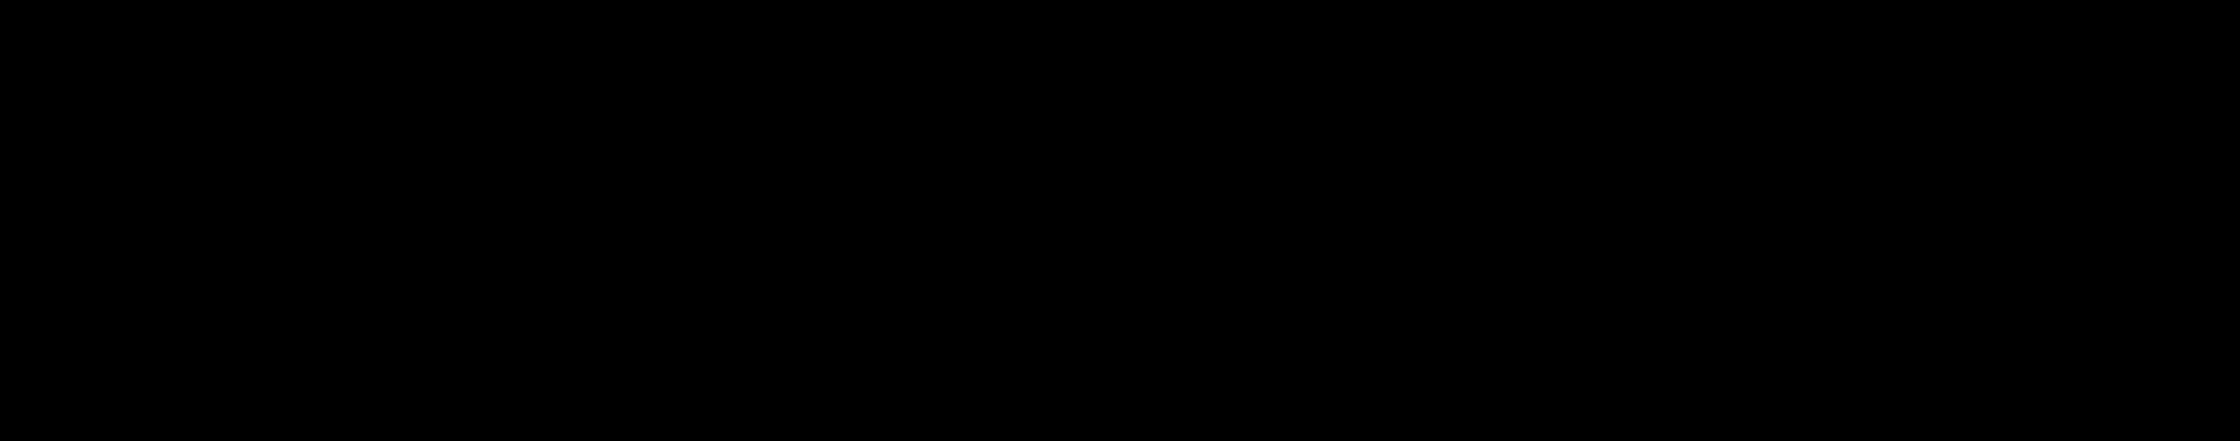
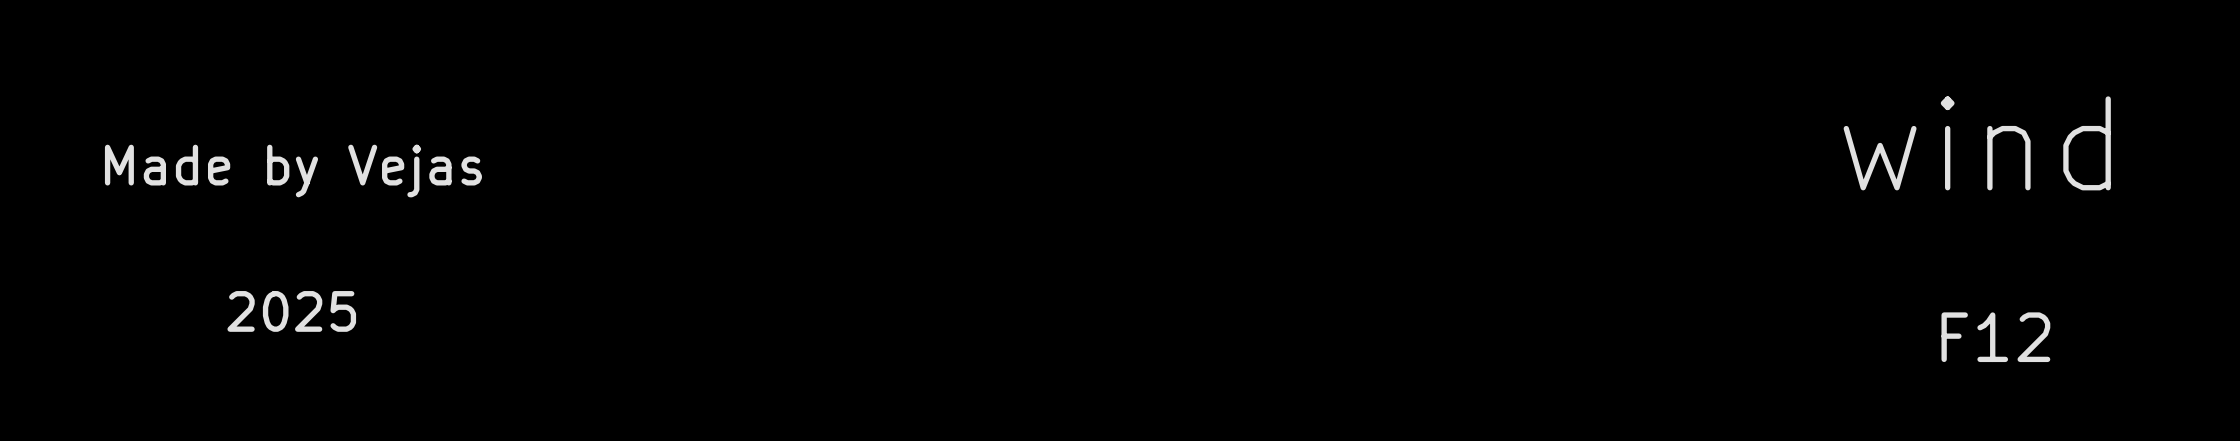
text: none -> wind (1977, 143)
text: none -> Made by Vejas (293, 171)
text: none -> 2025 (291, 311)
text: none -> F12 (1995, 337)

